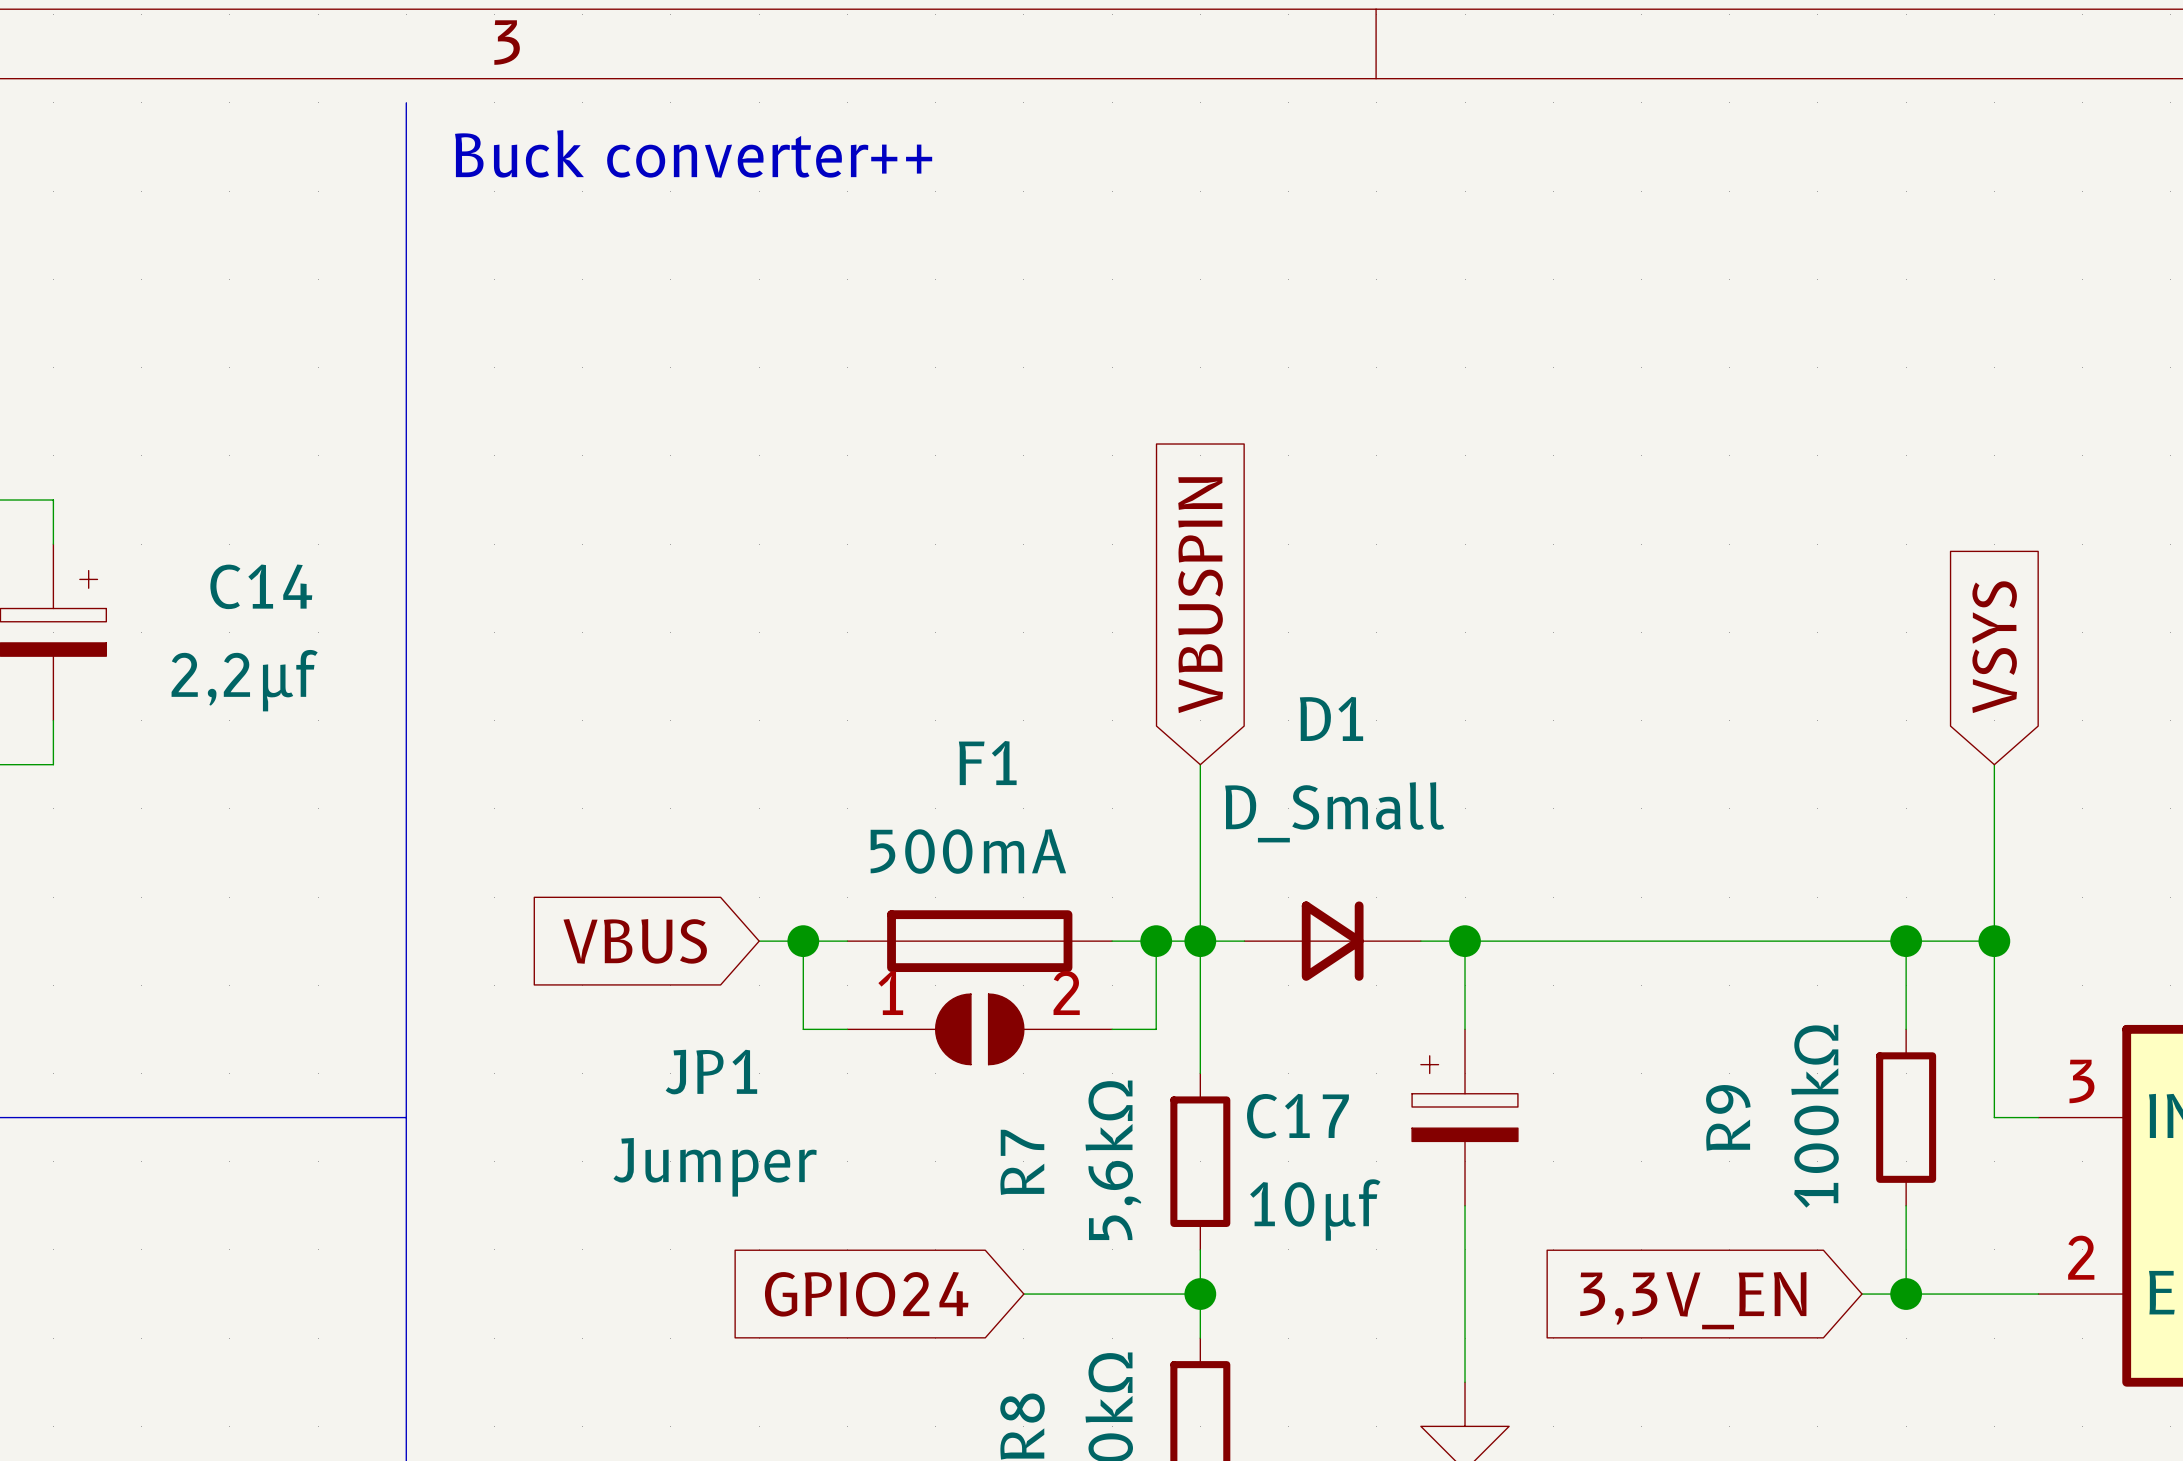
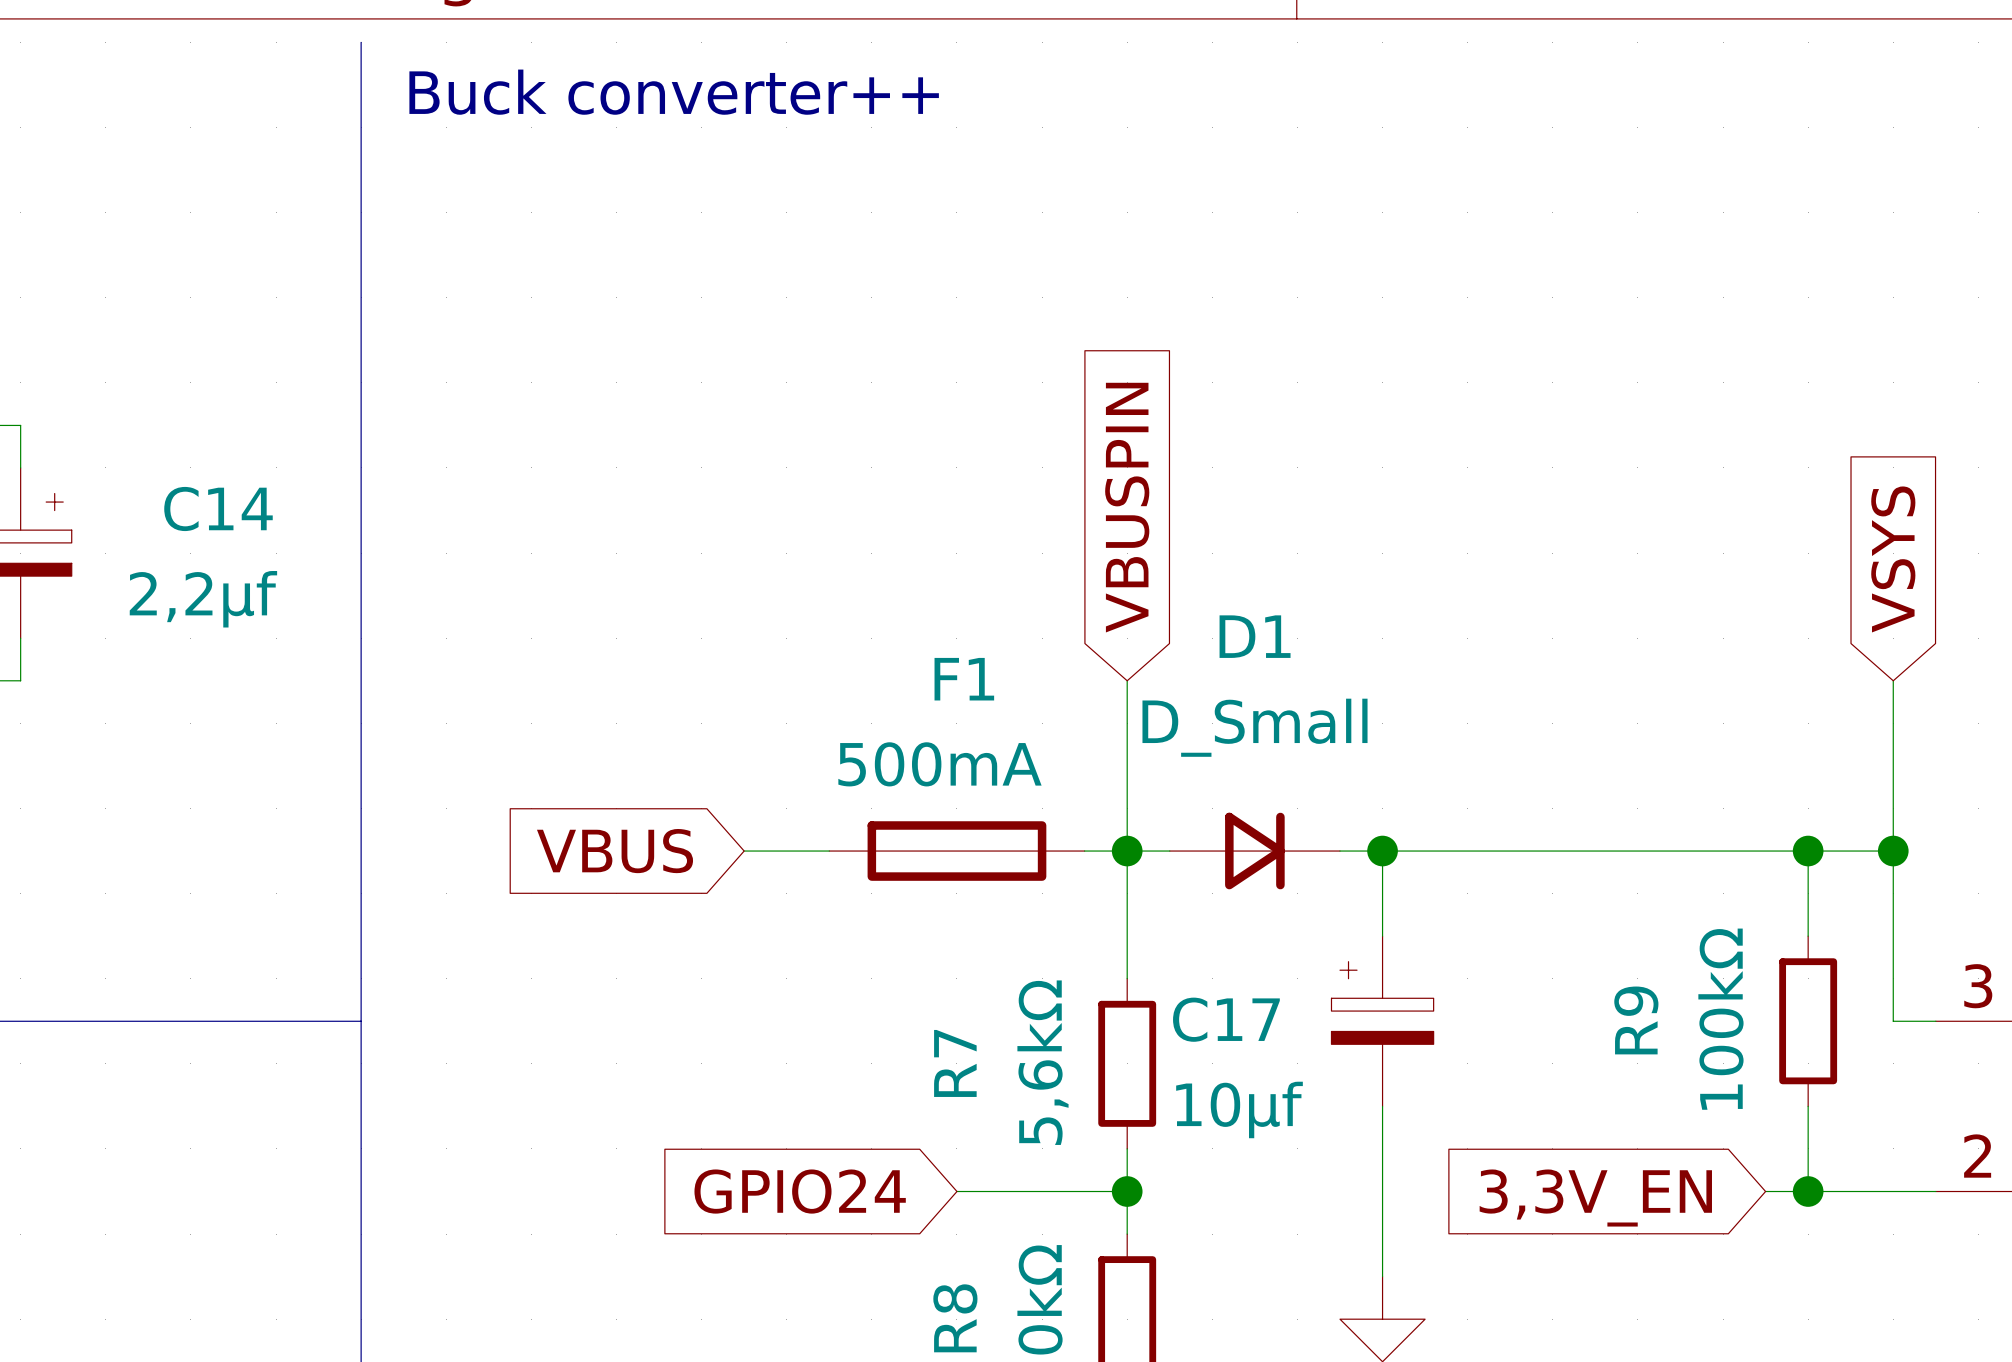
global label position: VBUS (635, 941) -> VBUS (615, 851)
wire: (759, 941) (803, 941) (803, 1029) (847, 1029) -> none
junction: (803, 941) -> none
F1 position: (979, 941) -> (956, 851)
wire: (1112, 941) (1156, 941) (1156, 1029) (1112, 1029) -> none
junction: (1156, 941) -> none
JP1: Jumper (979, 1029) -> none

